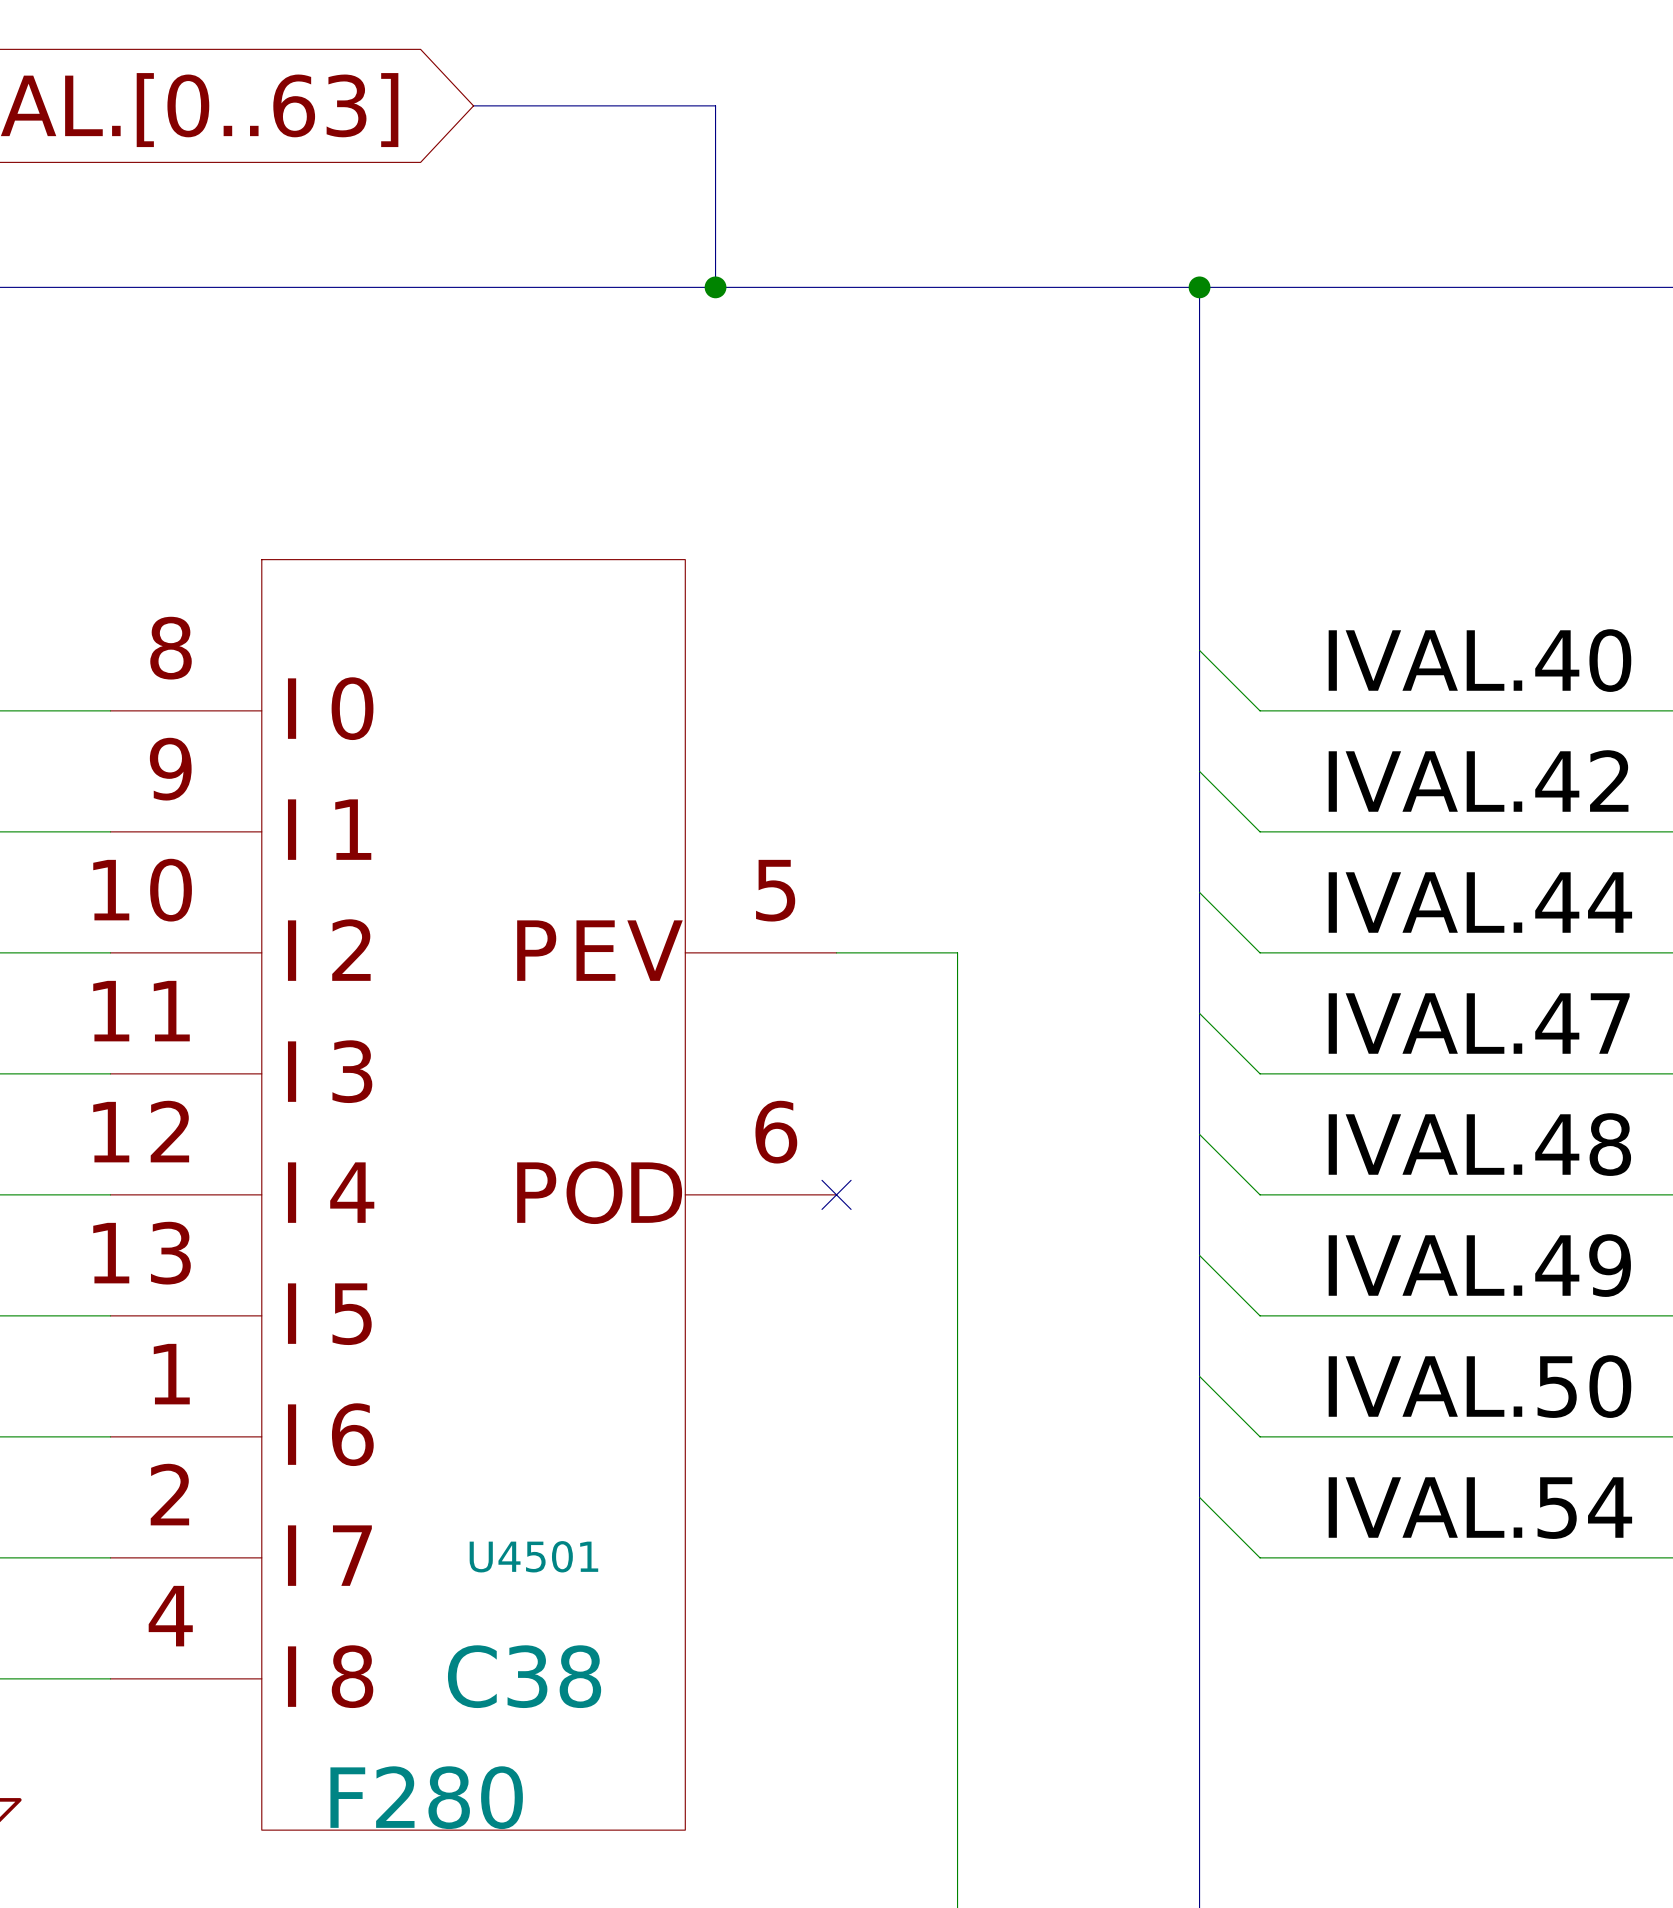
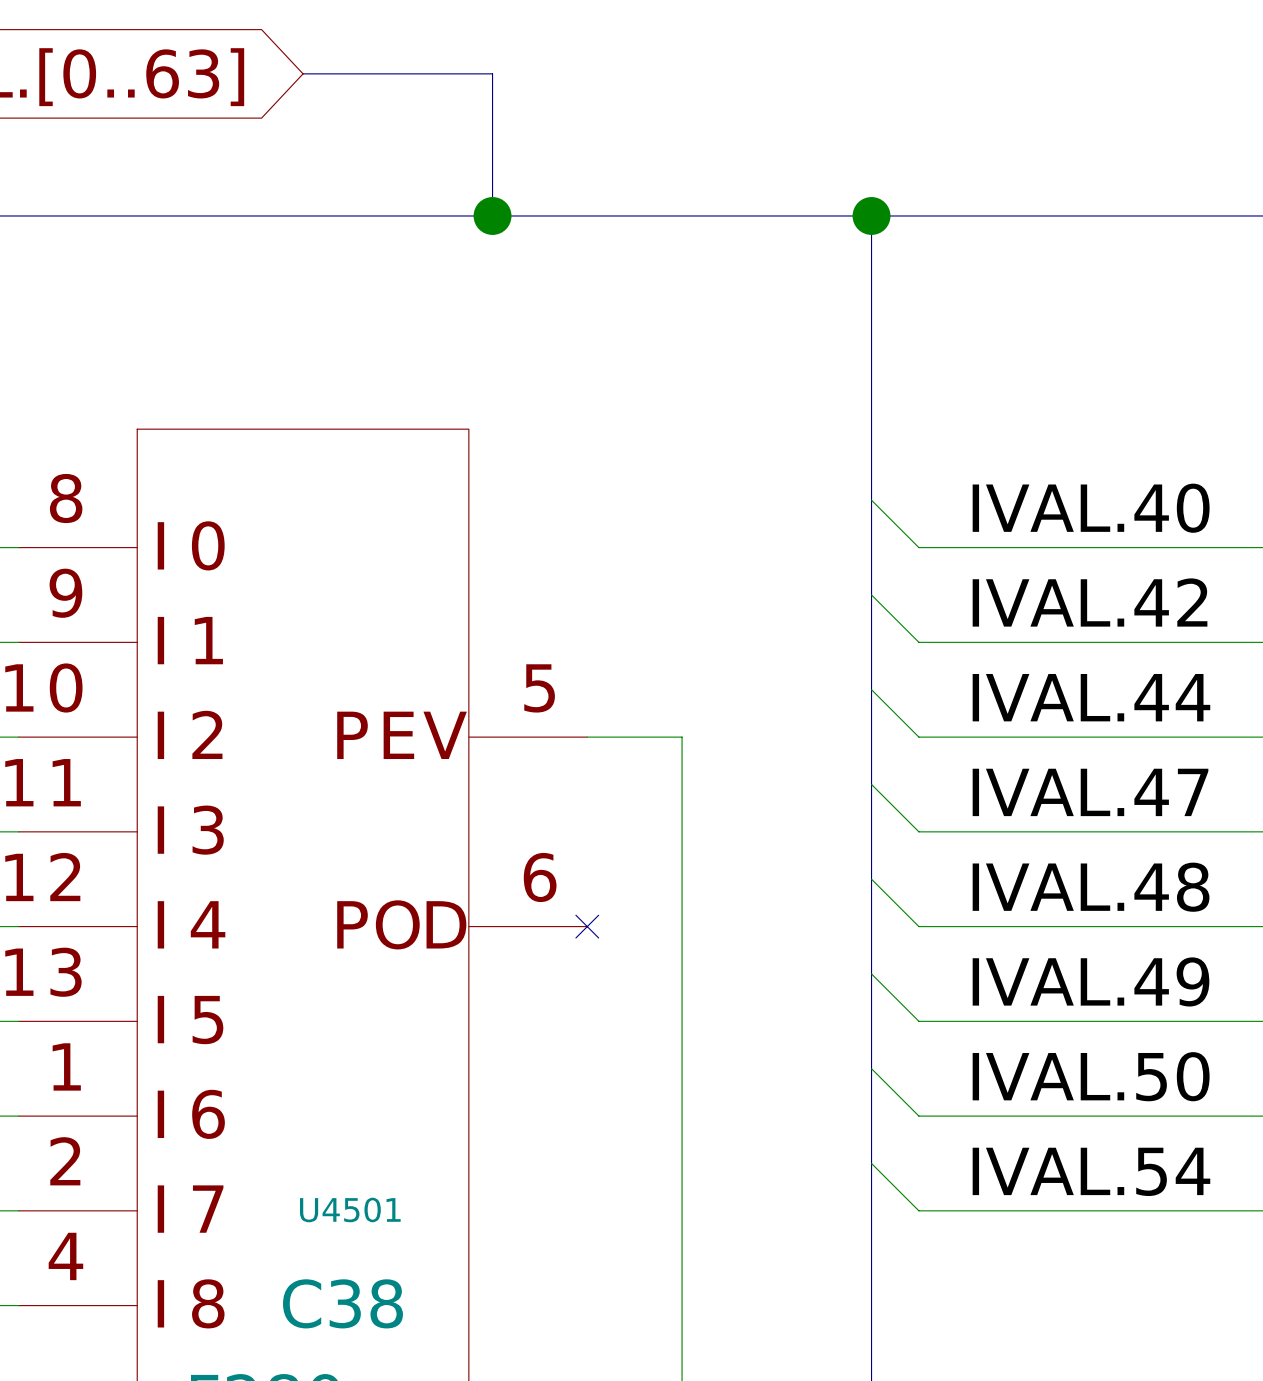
junction size: [704, 276, 727, 299] -> [473, 197, 512, 235]
junction size: [1188, 276, 1211, 299] -> [852, 197, 891, 235]

